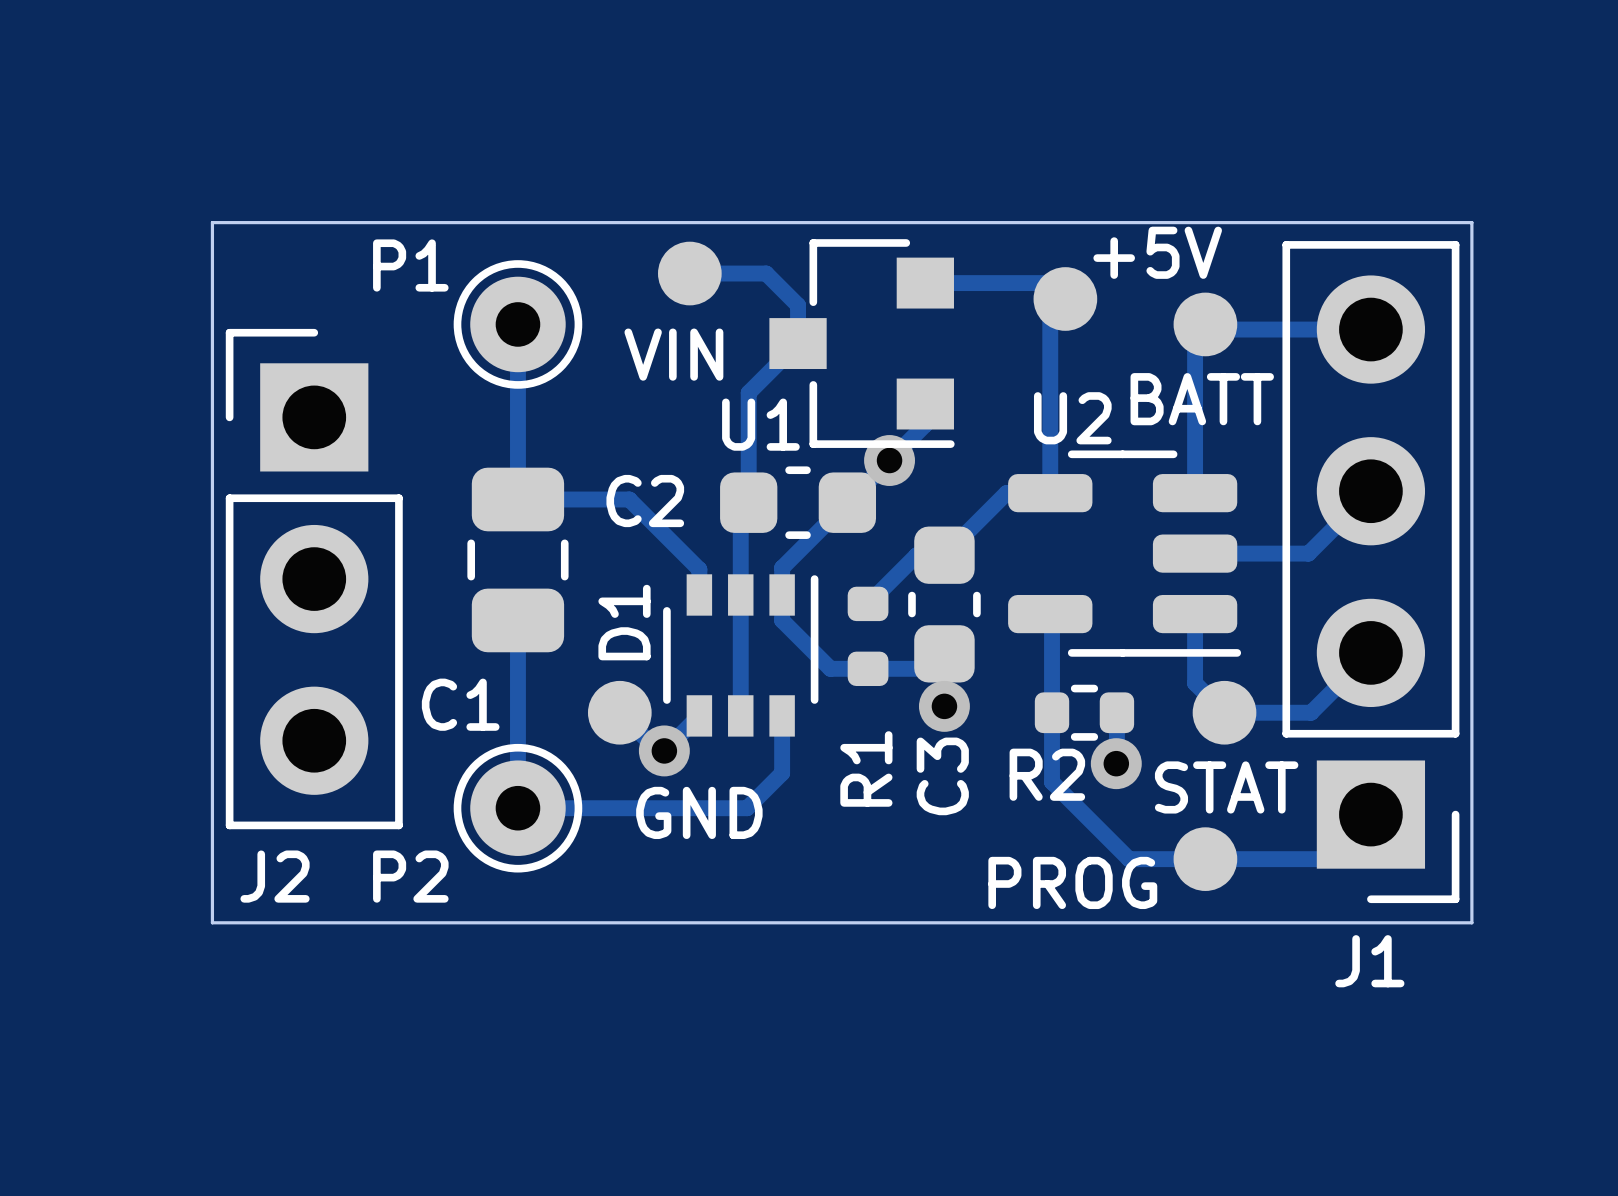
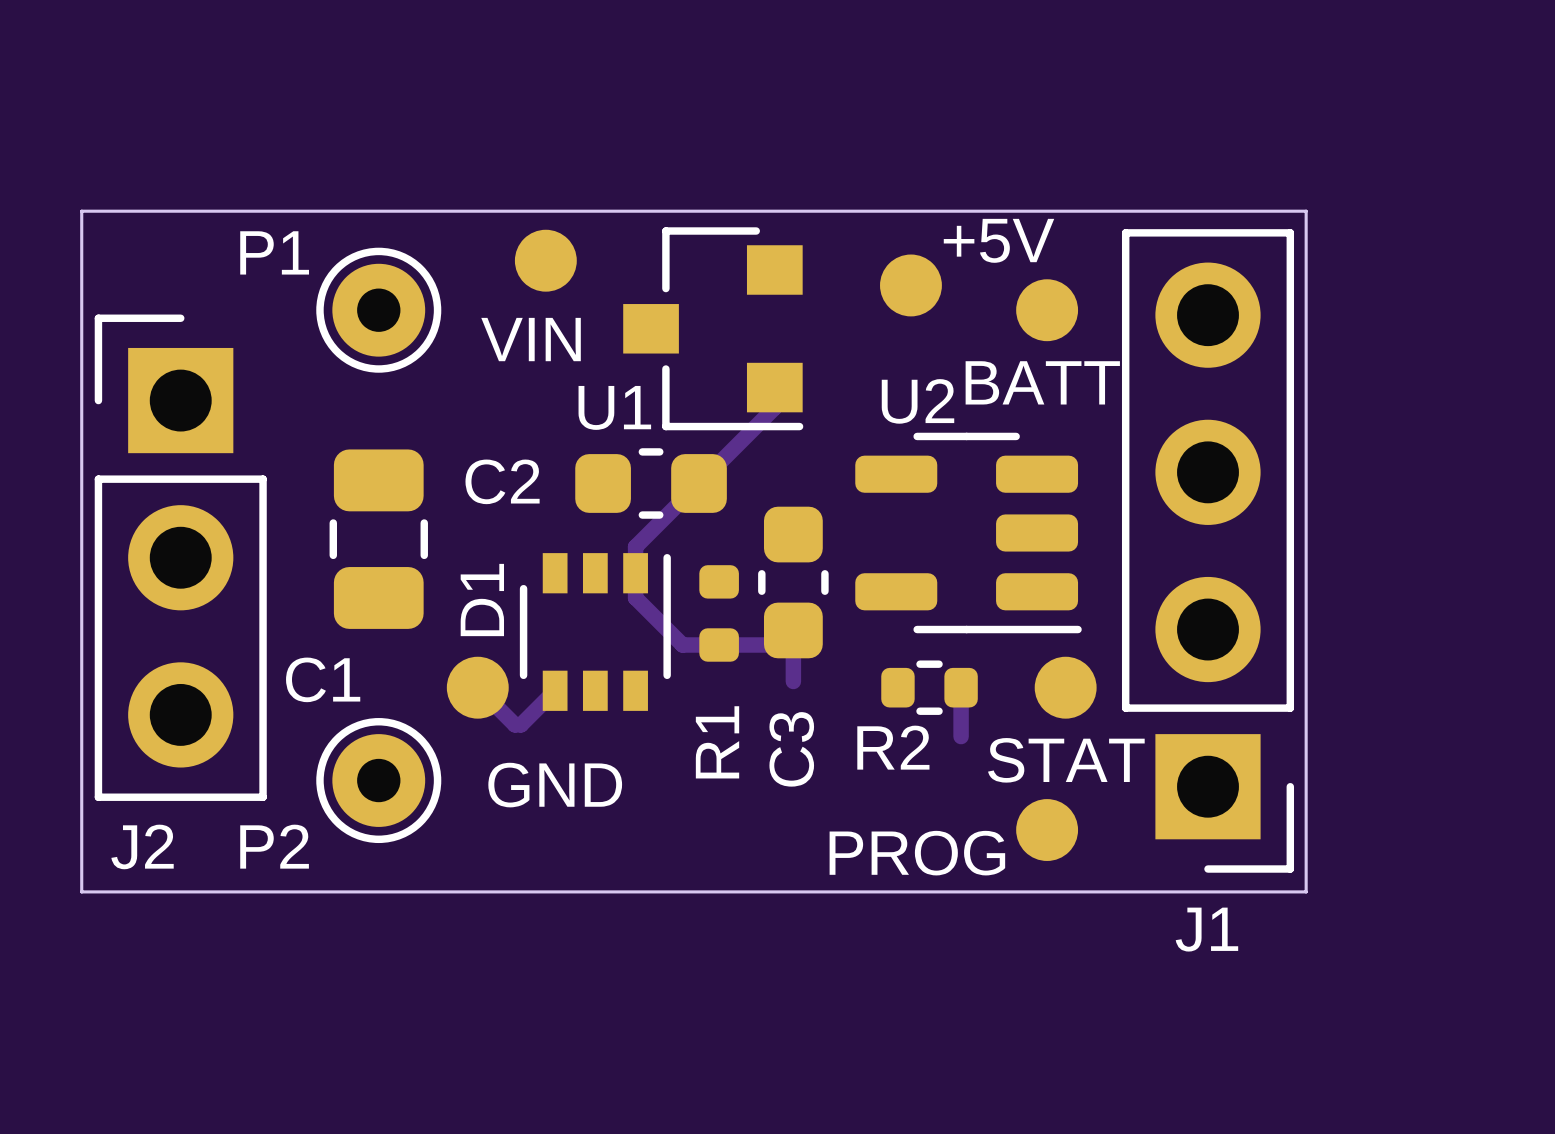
track: (689, 273) (766, 273) (798, 305) (798, 343) (748, 392) (748, 502) (740, 510) (740, 715) -> none
track: (925, 283) (1049, 283) (1065, 298) (1050, 314) (1050, 493) (1006, 493) (944, 555) (916, 555) (868, 603) -> none
track: (517, 324) (517, 499) (629, 499) (699, 569) (699, 594) -> none
track: (1370, 329) (1210, 329) (1205, 324) (1195, 334) (1195, 493) -> none
via: (889, 460) -> none
track: (1370, 491) (1308, 553) (1195, 553) -> none
track: (1050, 614) (1052, 615) (1052, 782) (1129, 859) (1326, 859) (1370, 814) -> none
track: (1195, 614) (1195, 683) (1224, 712) (1311, 712) (1370, 652) -> none
track: (517, 620) (517, 808) (747, 808) (782, 773) (782, 715) -> none
via: (944, 706) -> none
via: (664, 750) -> none
via: (1116, 763) -> none

